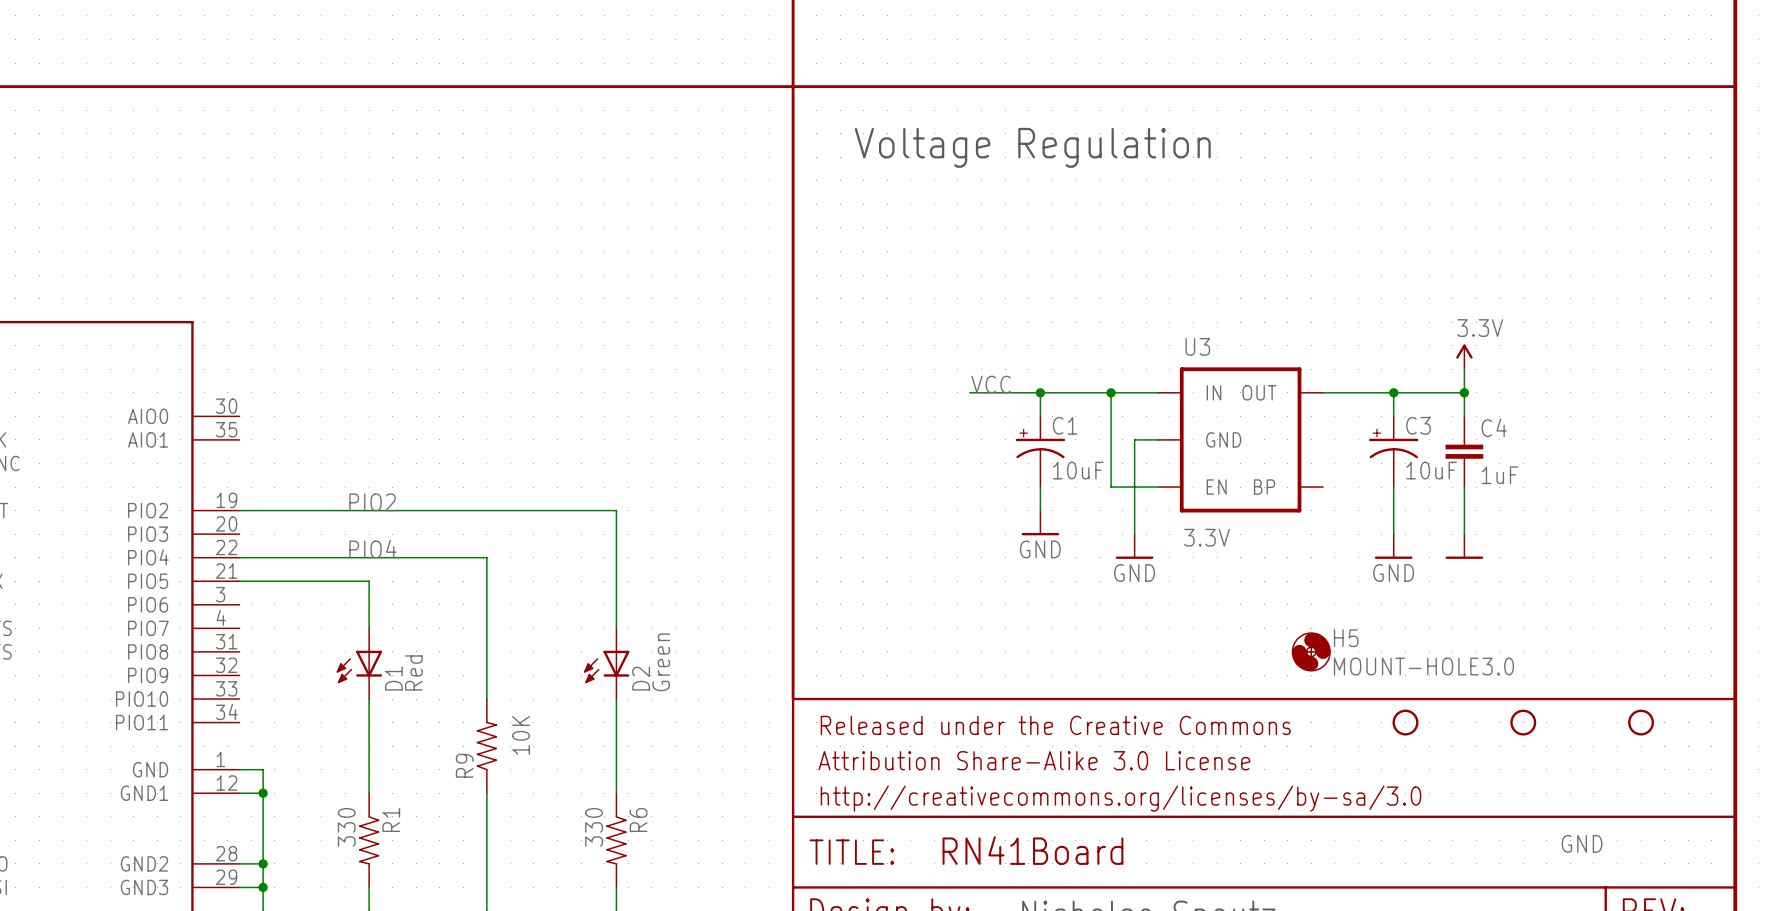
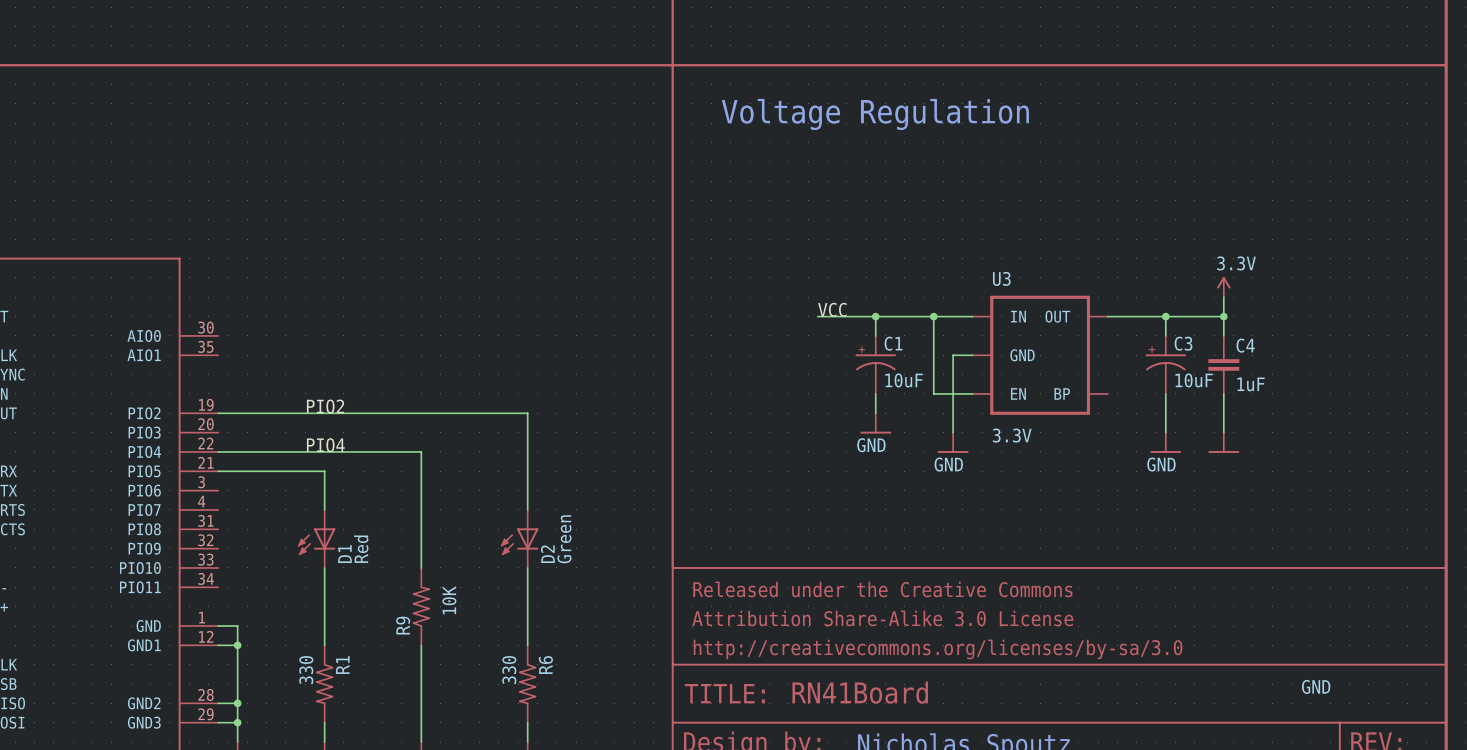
H5: MOUNT-HOLE3.0 (1311, 651) -> none
part: (1405, 722) -> none
part: (1523, 722) -> none
part: (1641, 722) -> none

